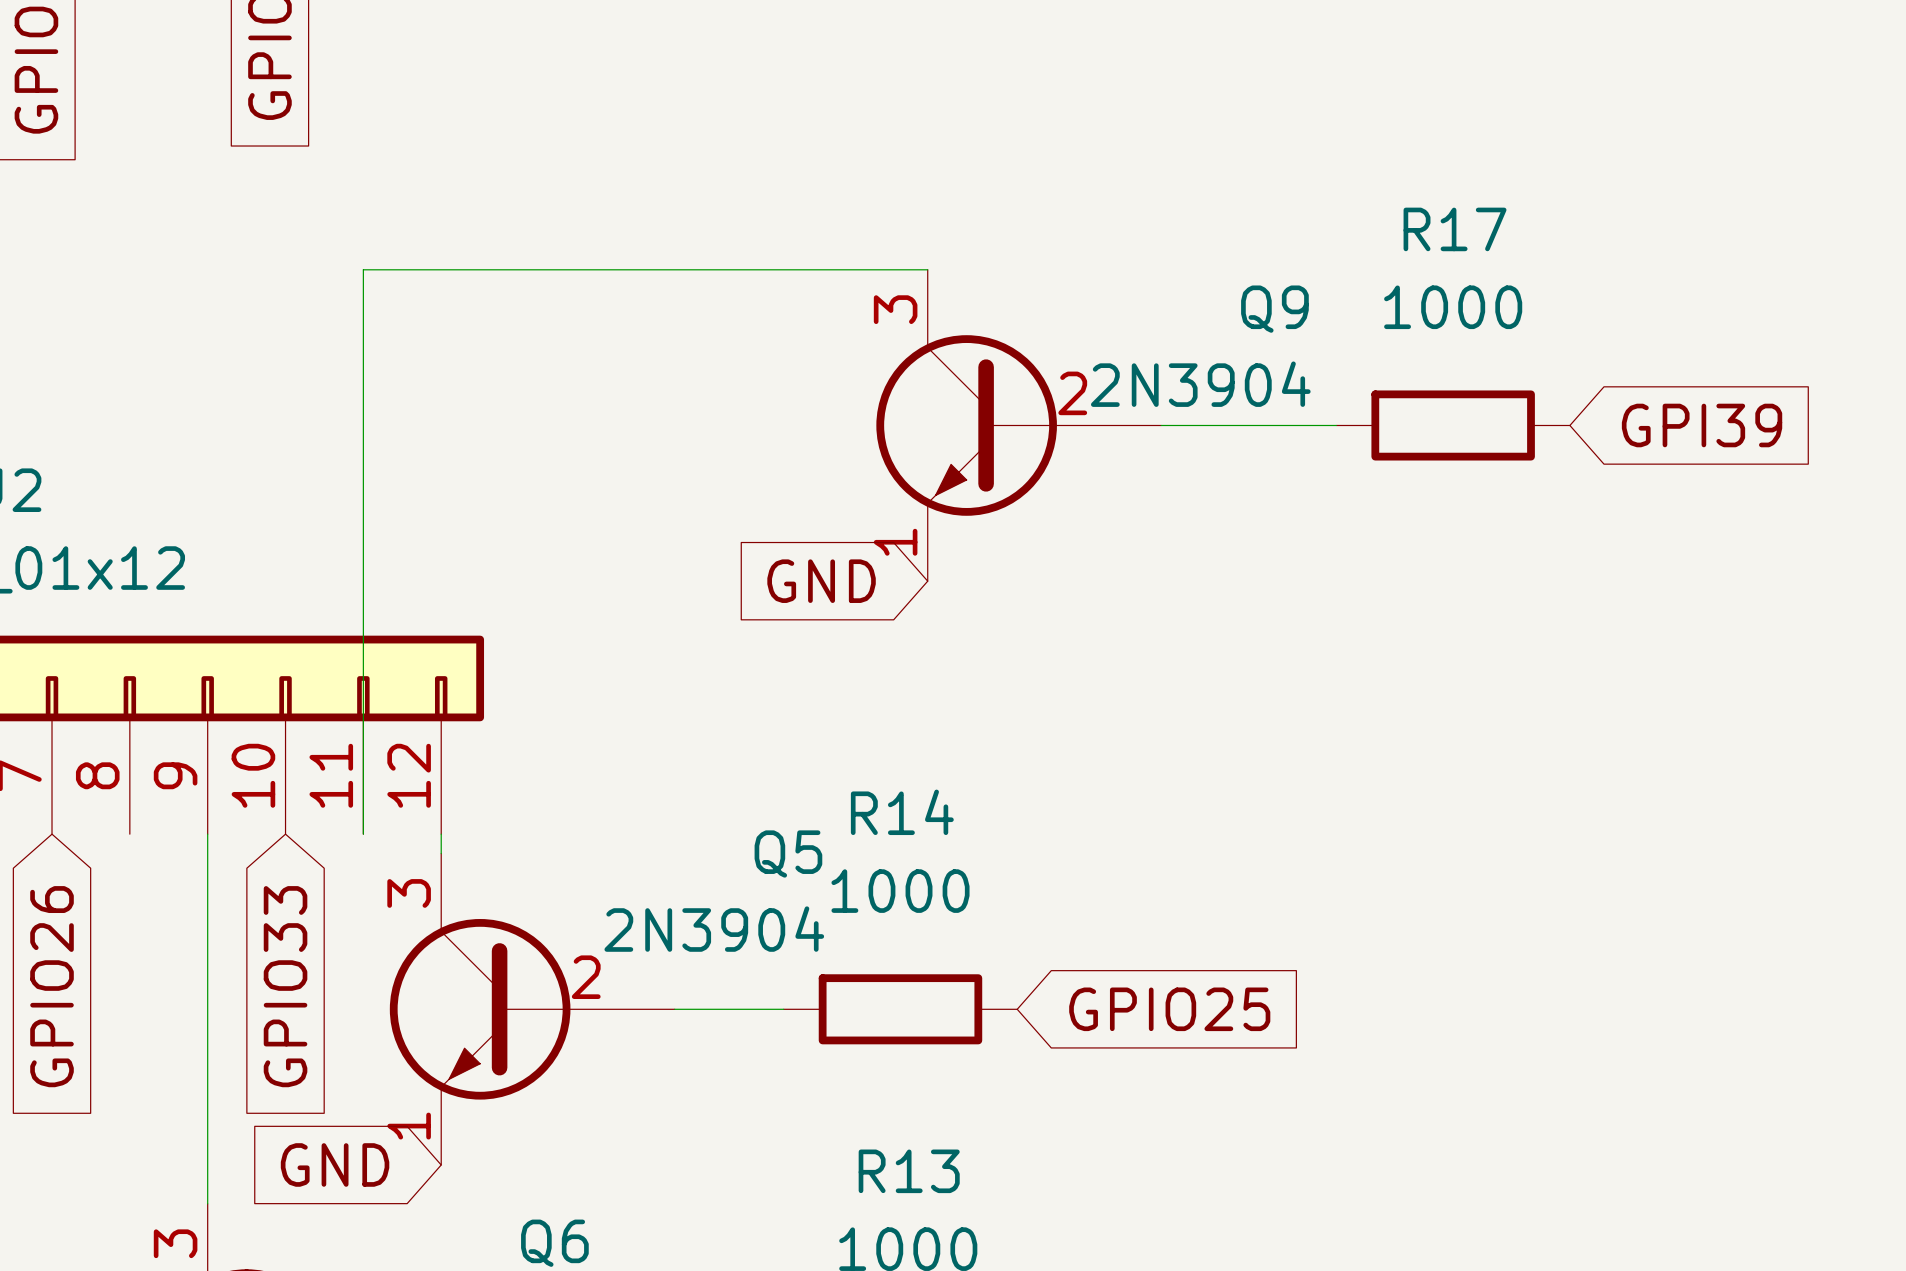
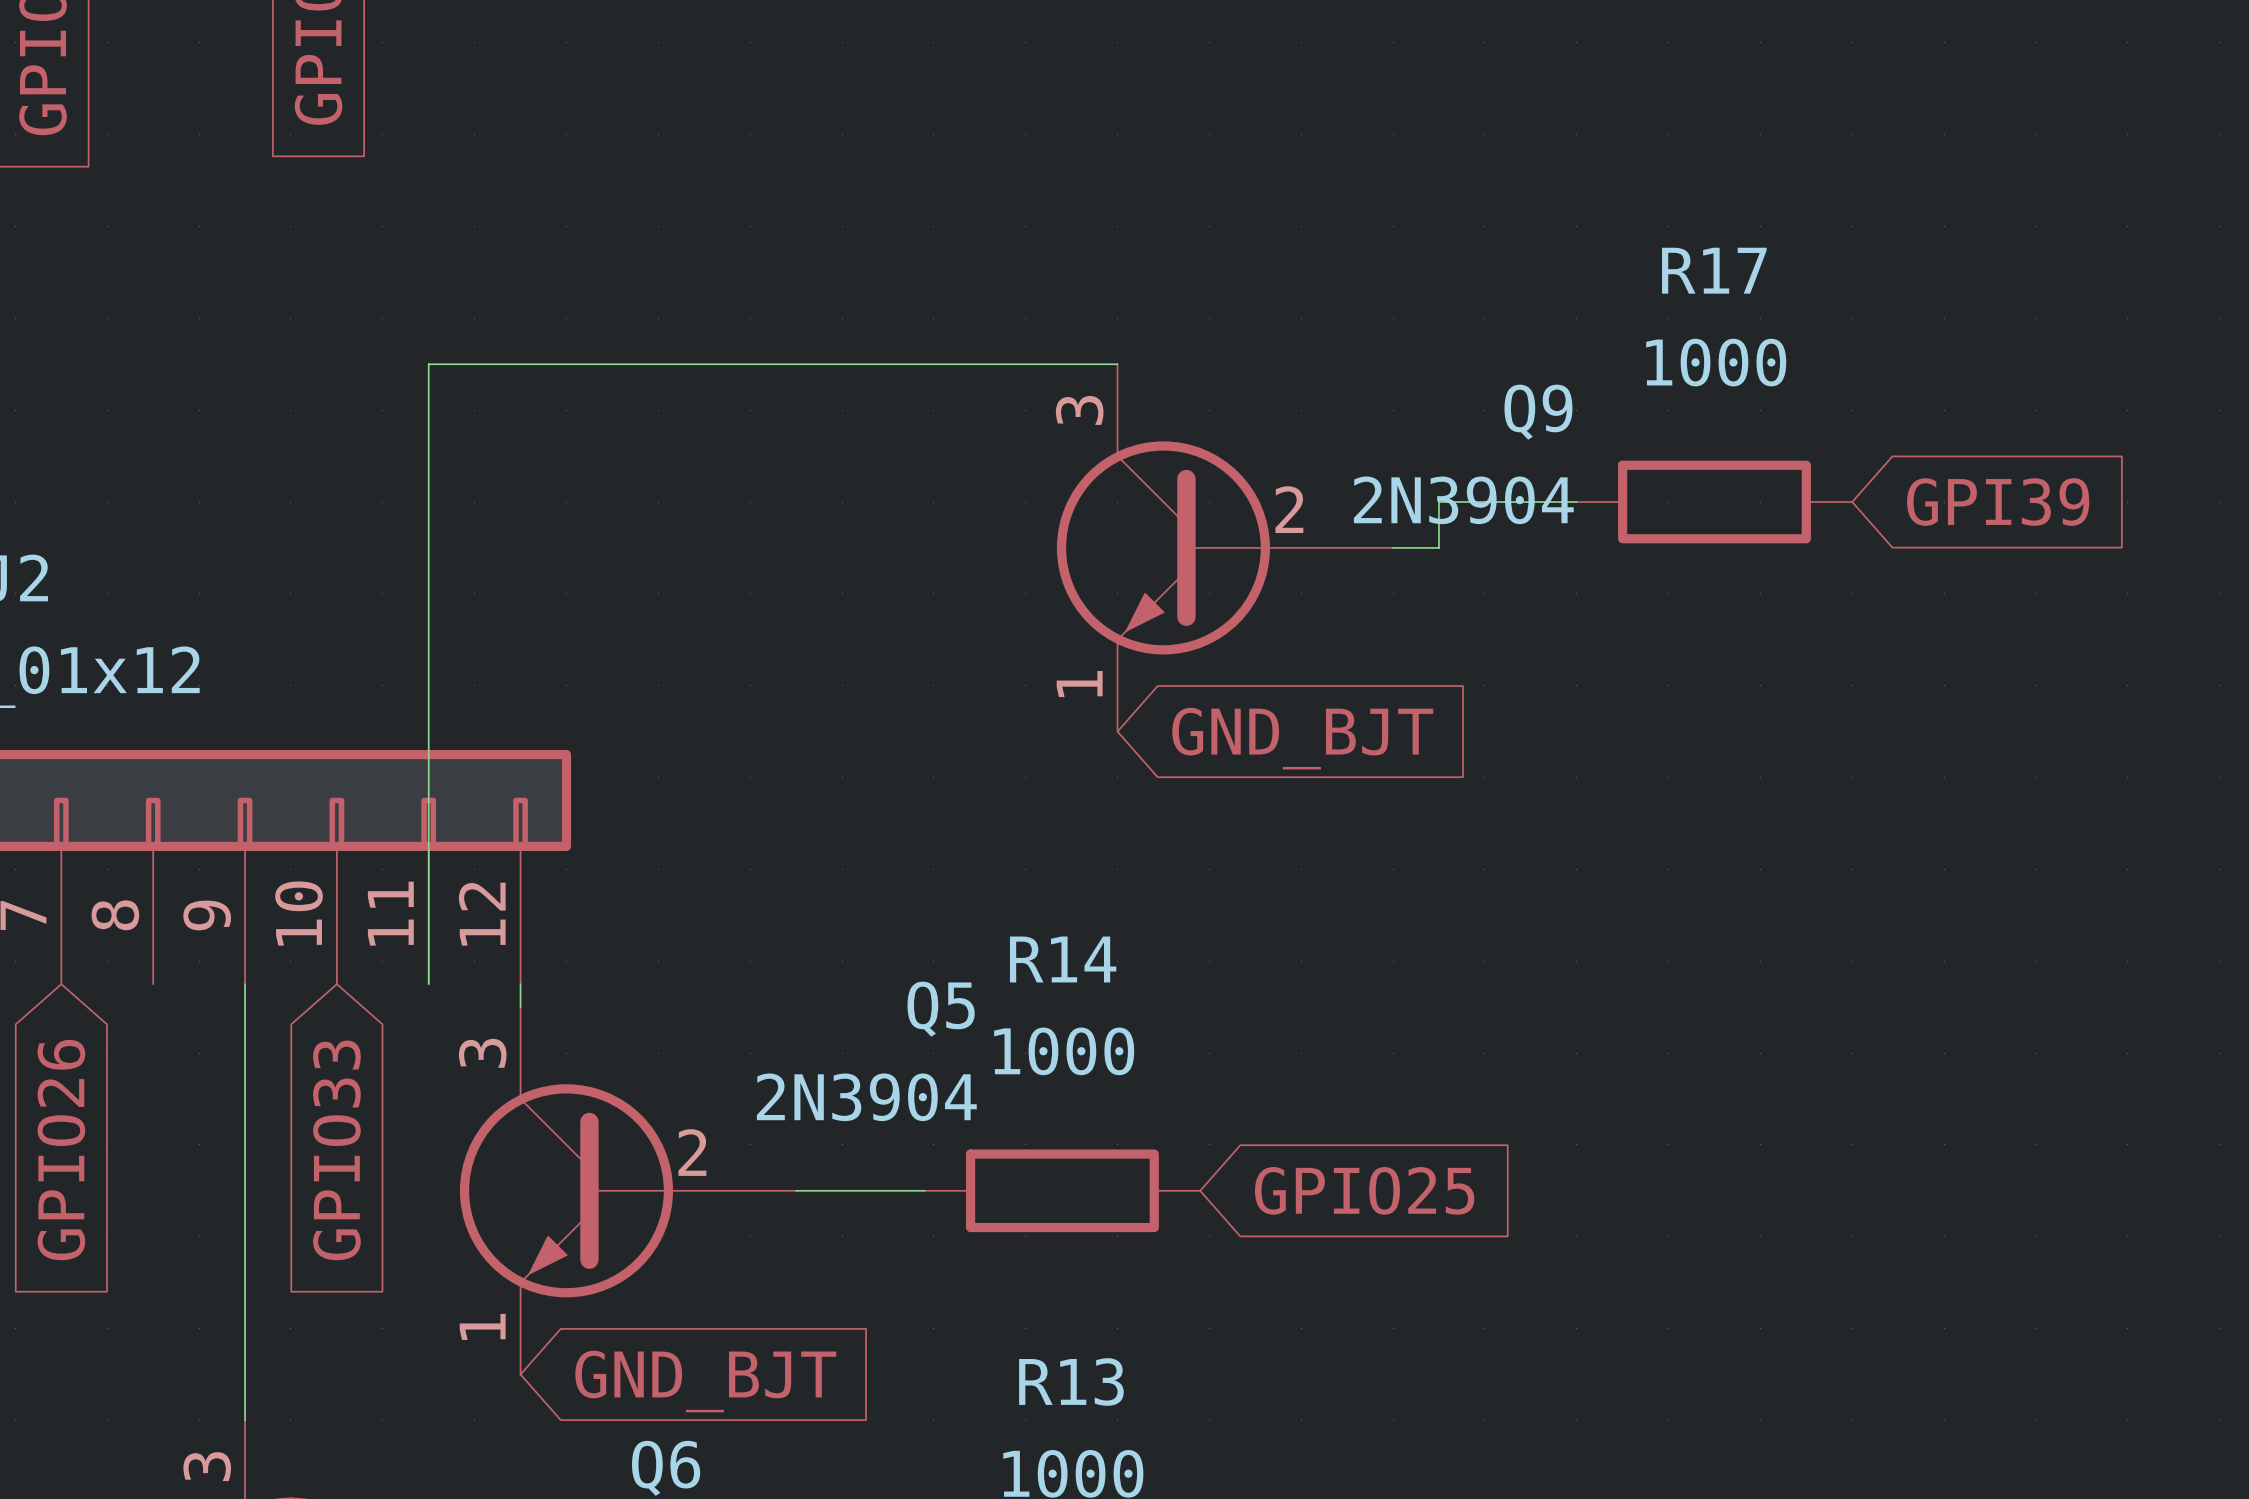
wire: (927, 269) (363, 269) (363, 308) -> (1117, 364) (428, 364)
Q9 position: (1018, 425) -> (1224, 547)
wire: (1161, 425) (1219, 425) -> (1393, 547) (1438, 547) (1438, 502)
global label: GND (821, 581) -> none
global label: none -> GND_BJT (1302, 738)
global label: GND (335, 1164) -> GND_BJT (705, 1381)

